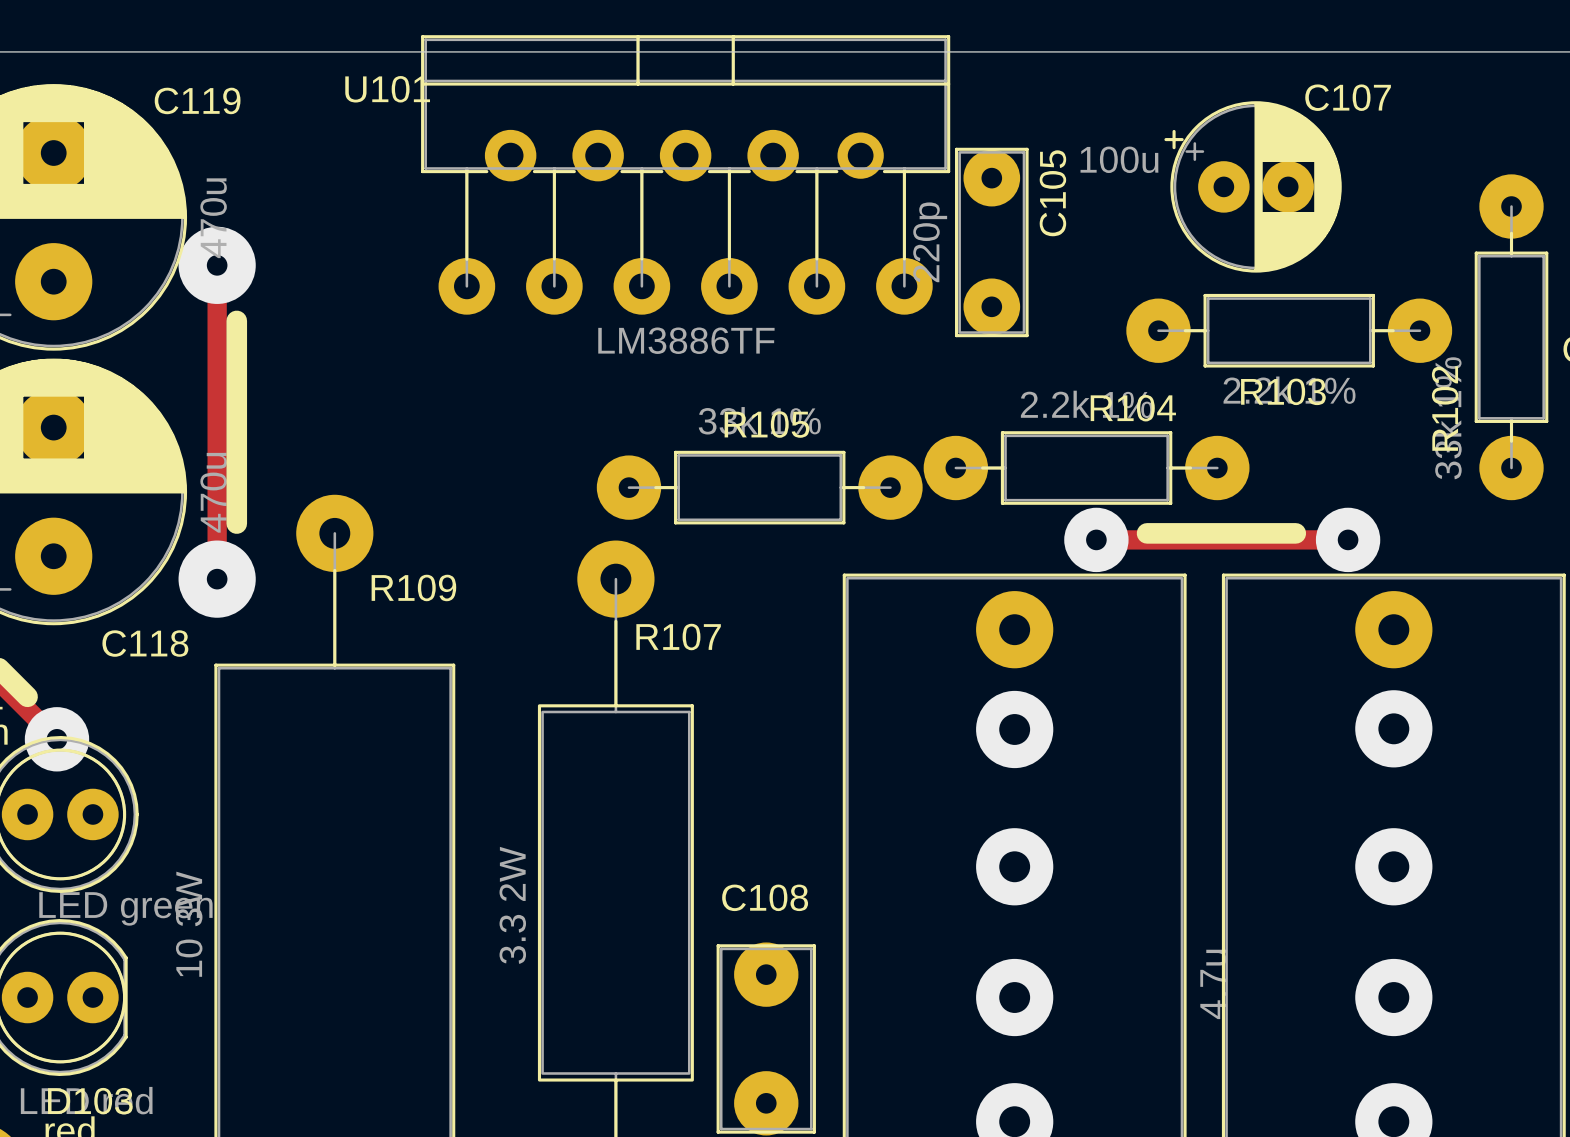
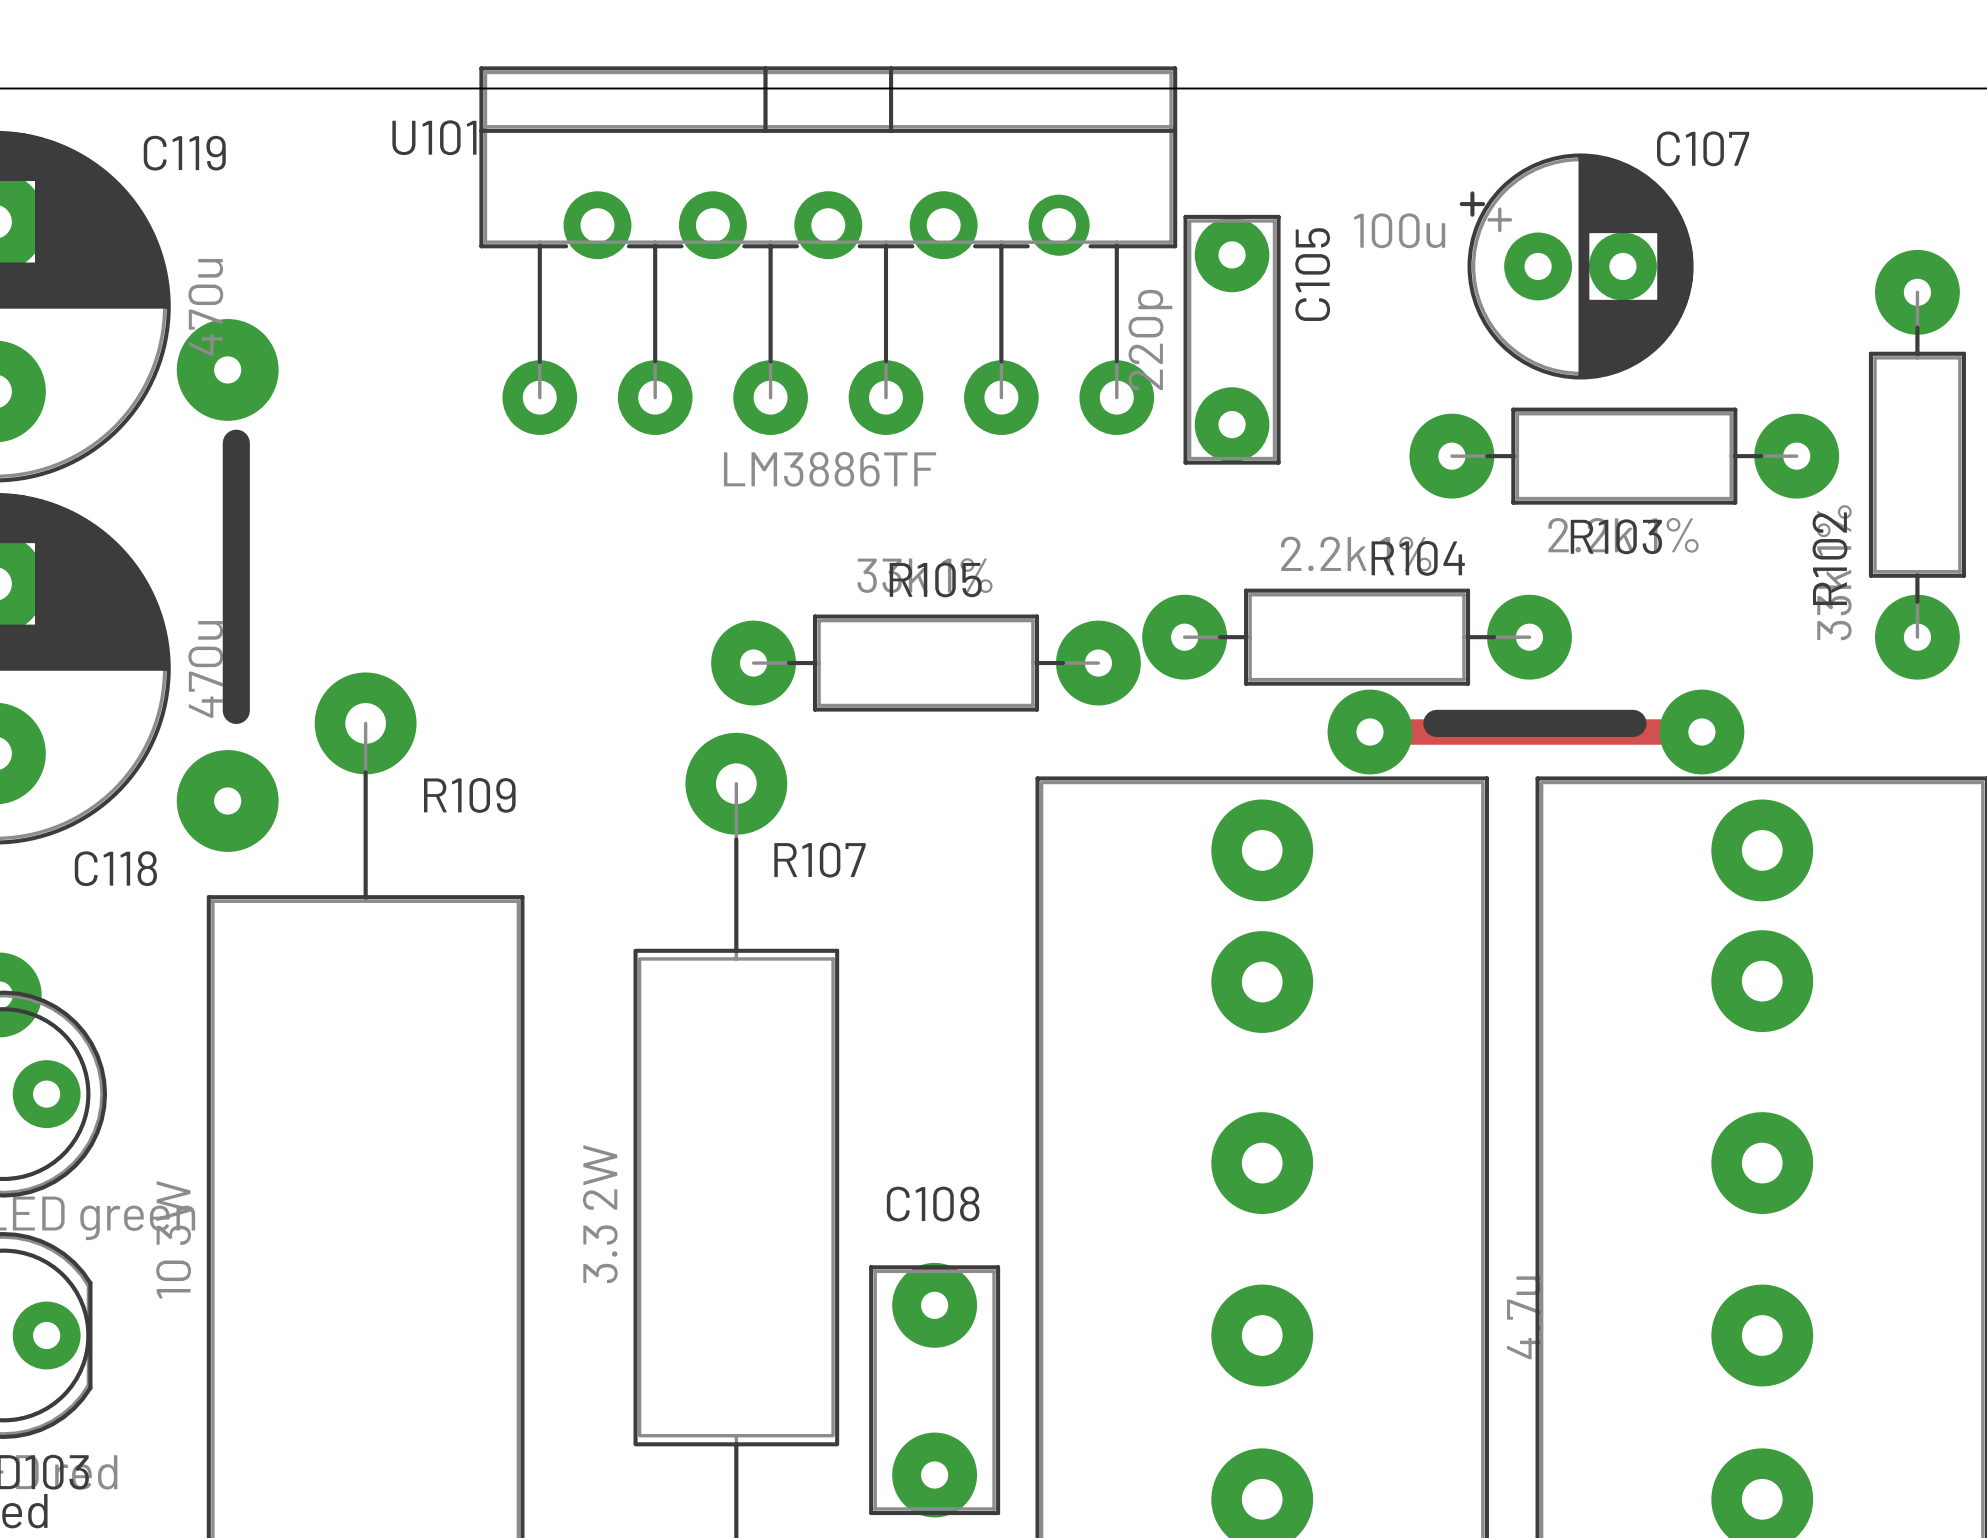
track: (217, 265) (217, 579) -> none
via position: (217, 265) -> (227, 369)
via position: (217, 579) -> (227, 800)

